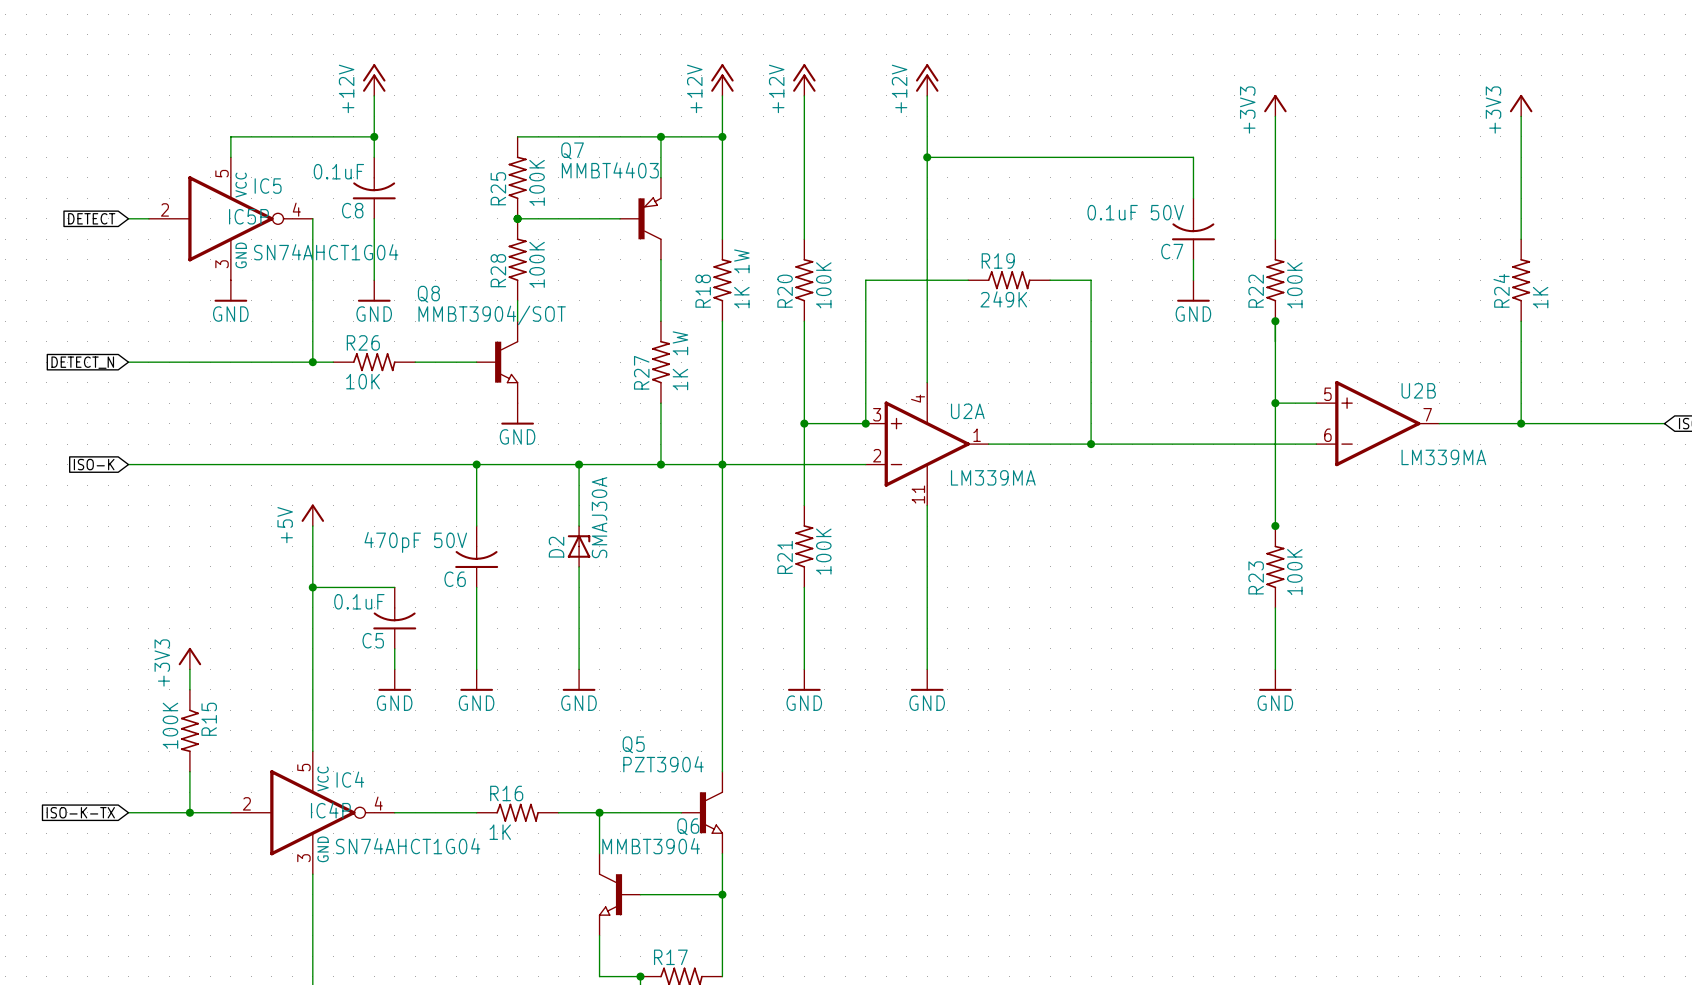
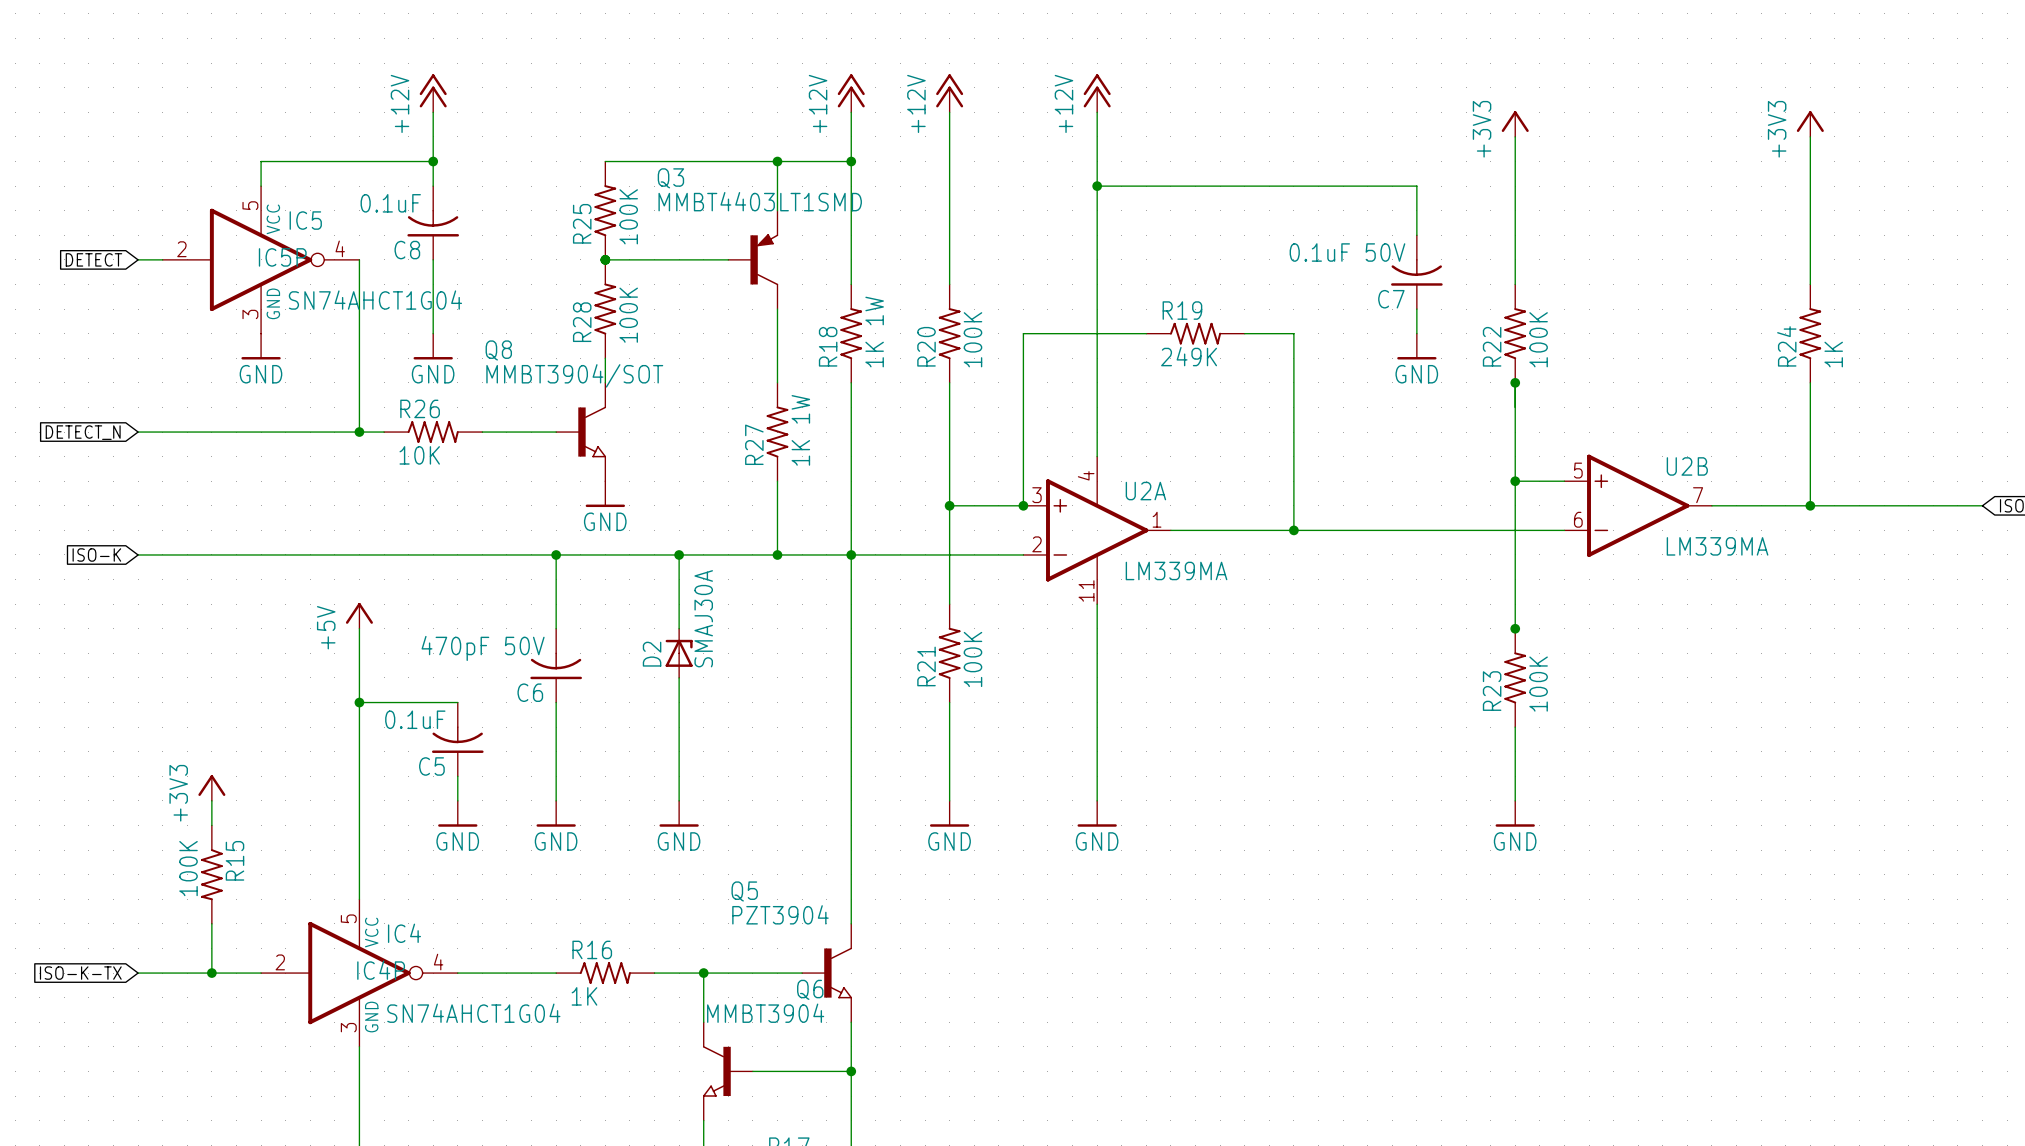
Q7: MMBT4403 (640, 218) -> none
Q3: none -> MMBT4403LT1SMD (753, 259)

